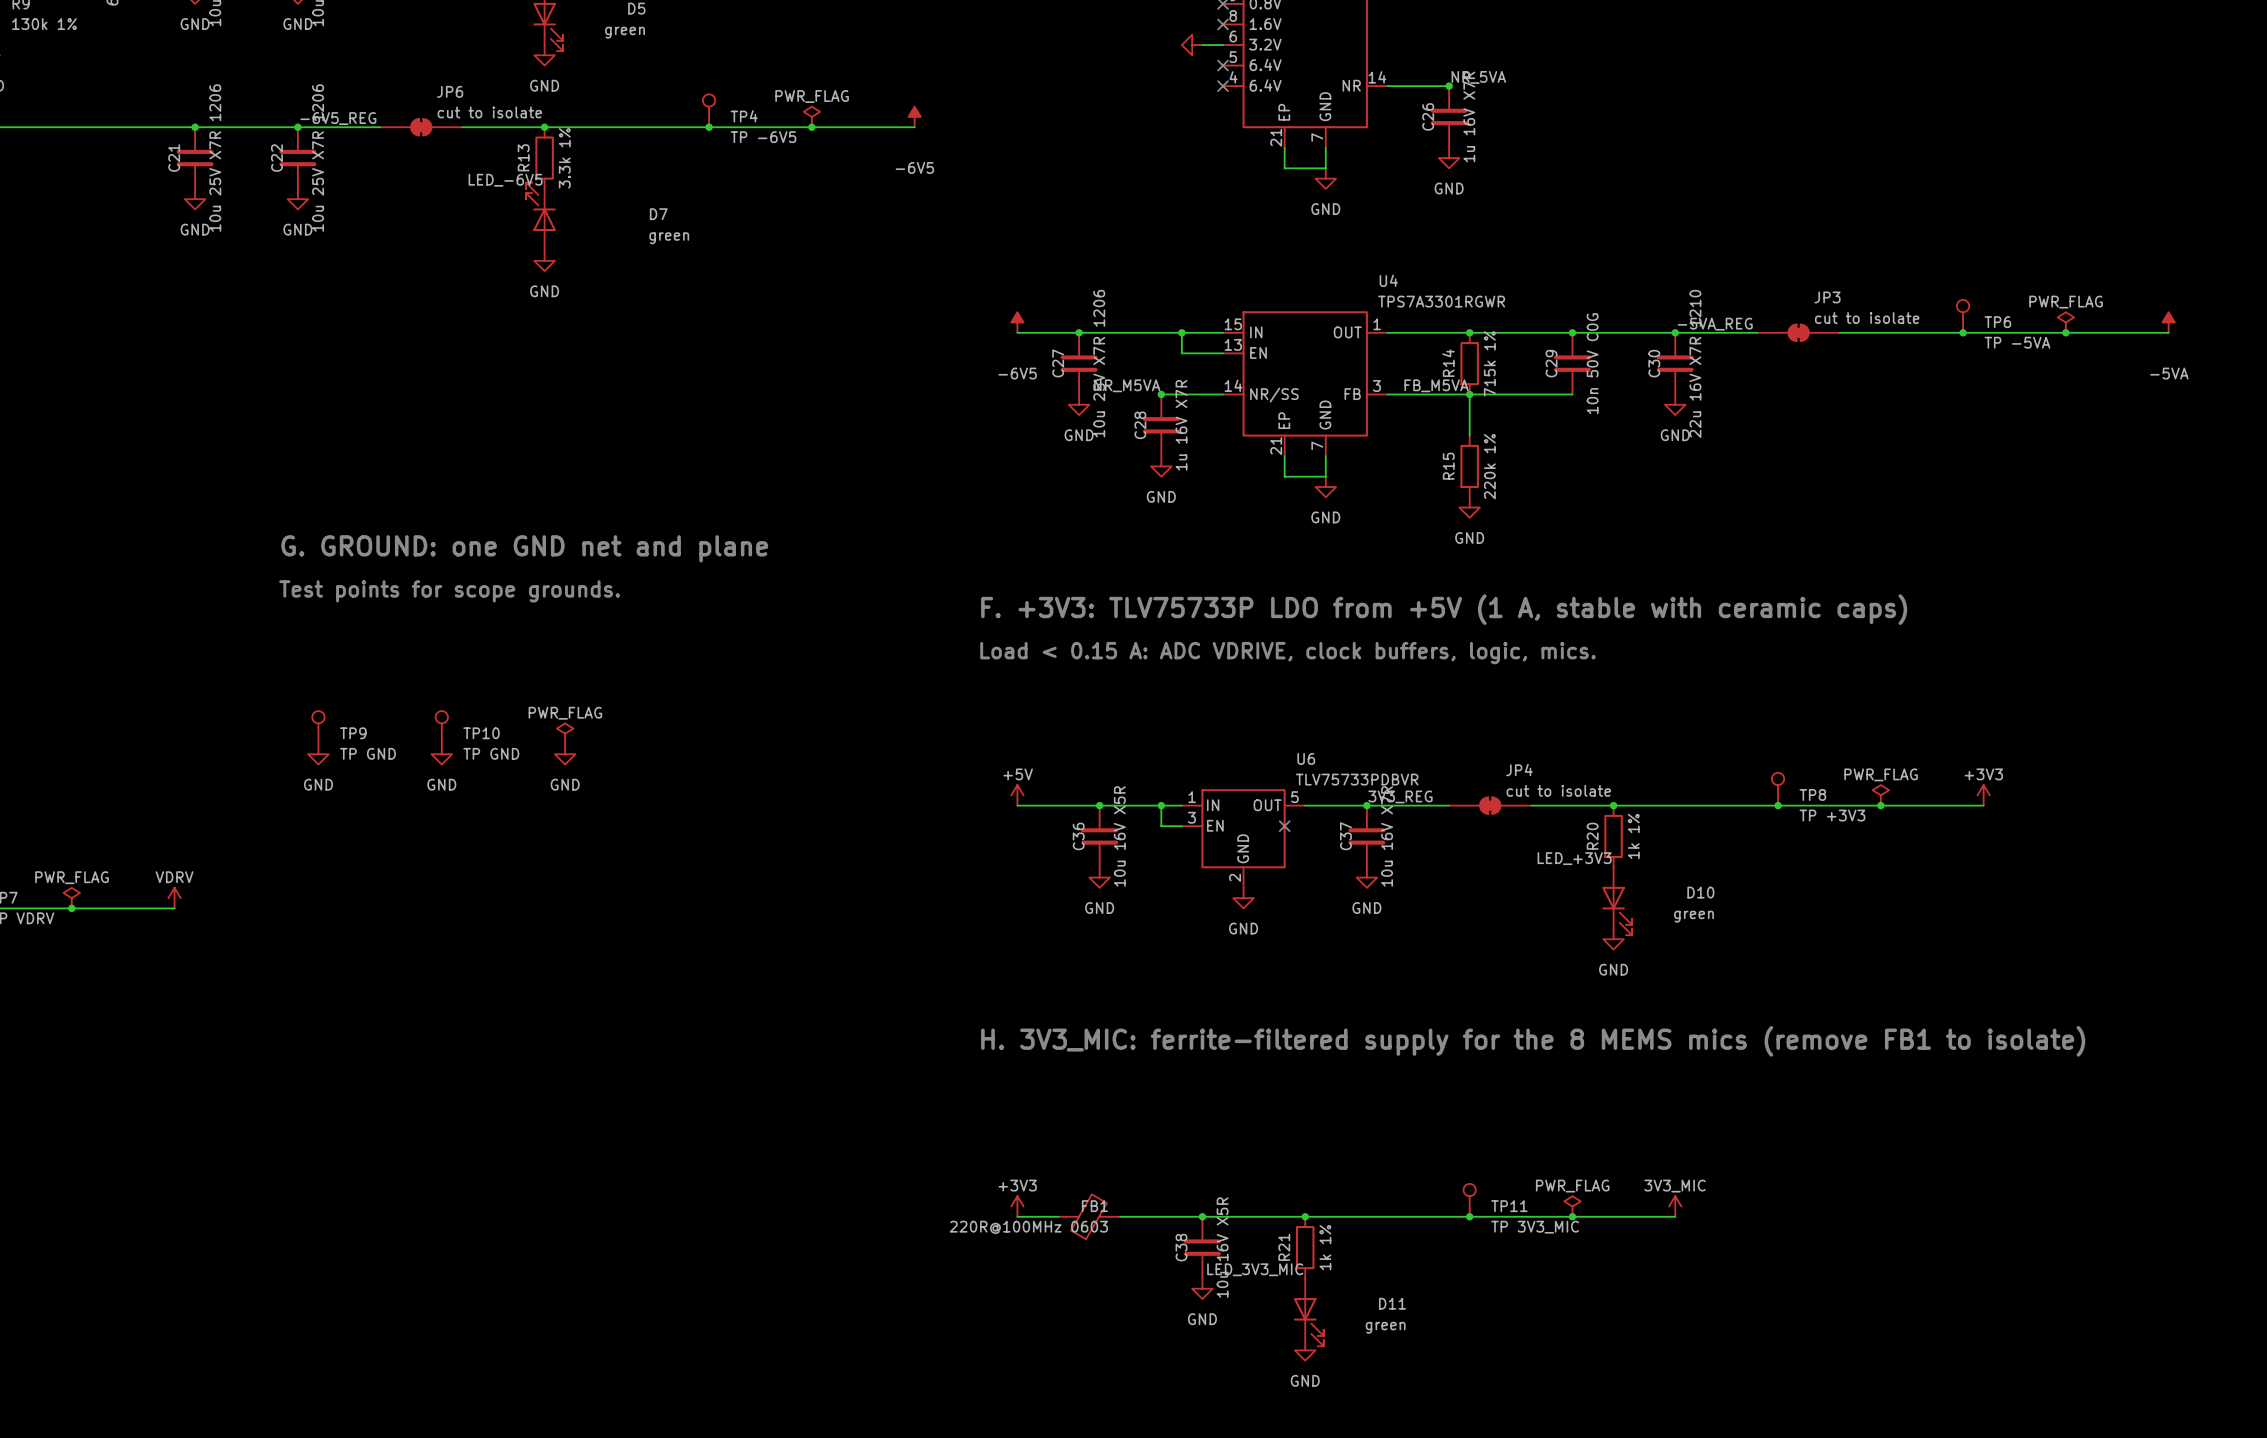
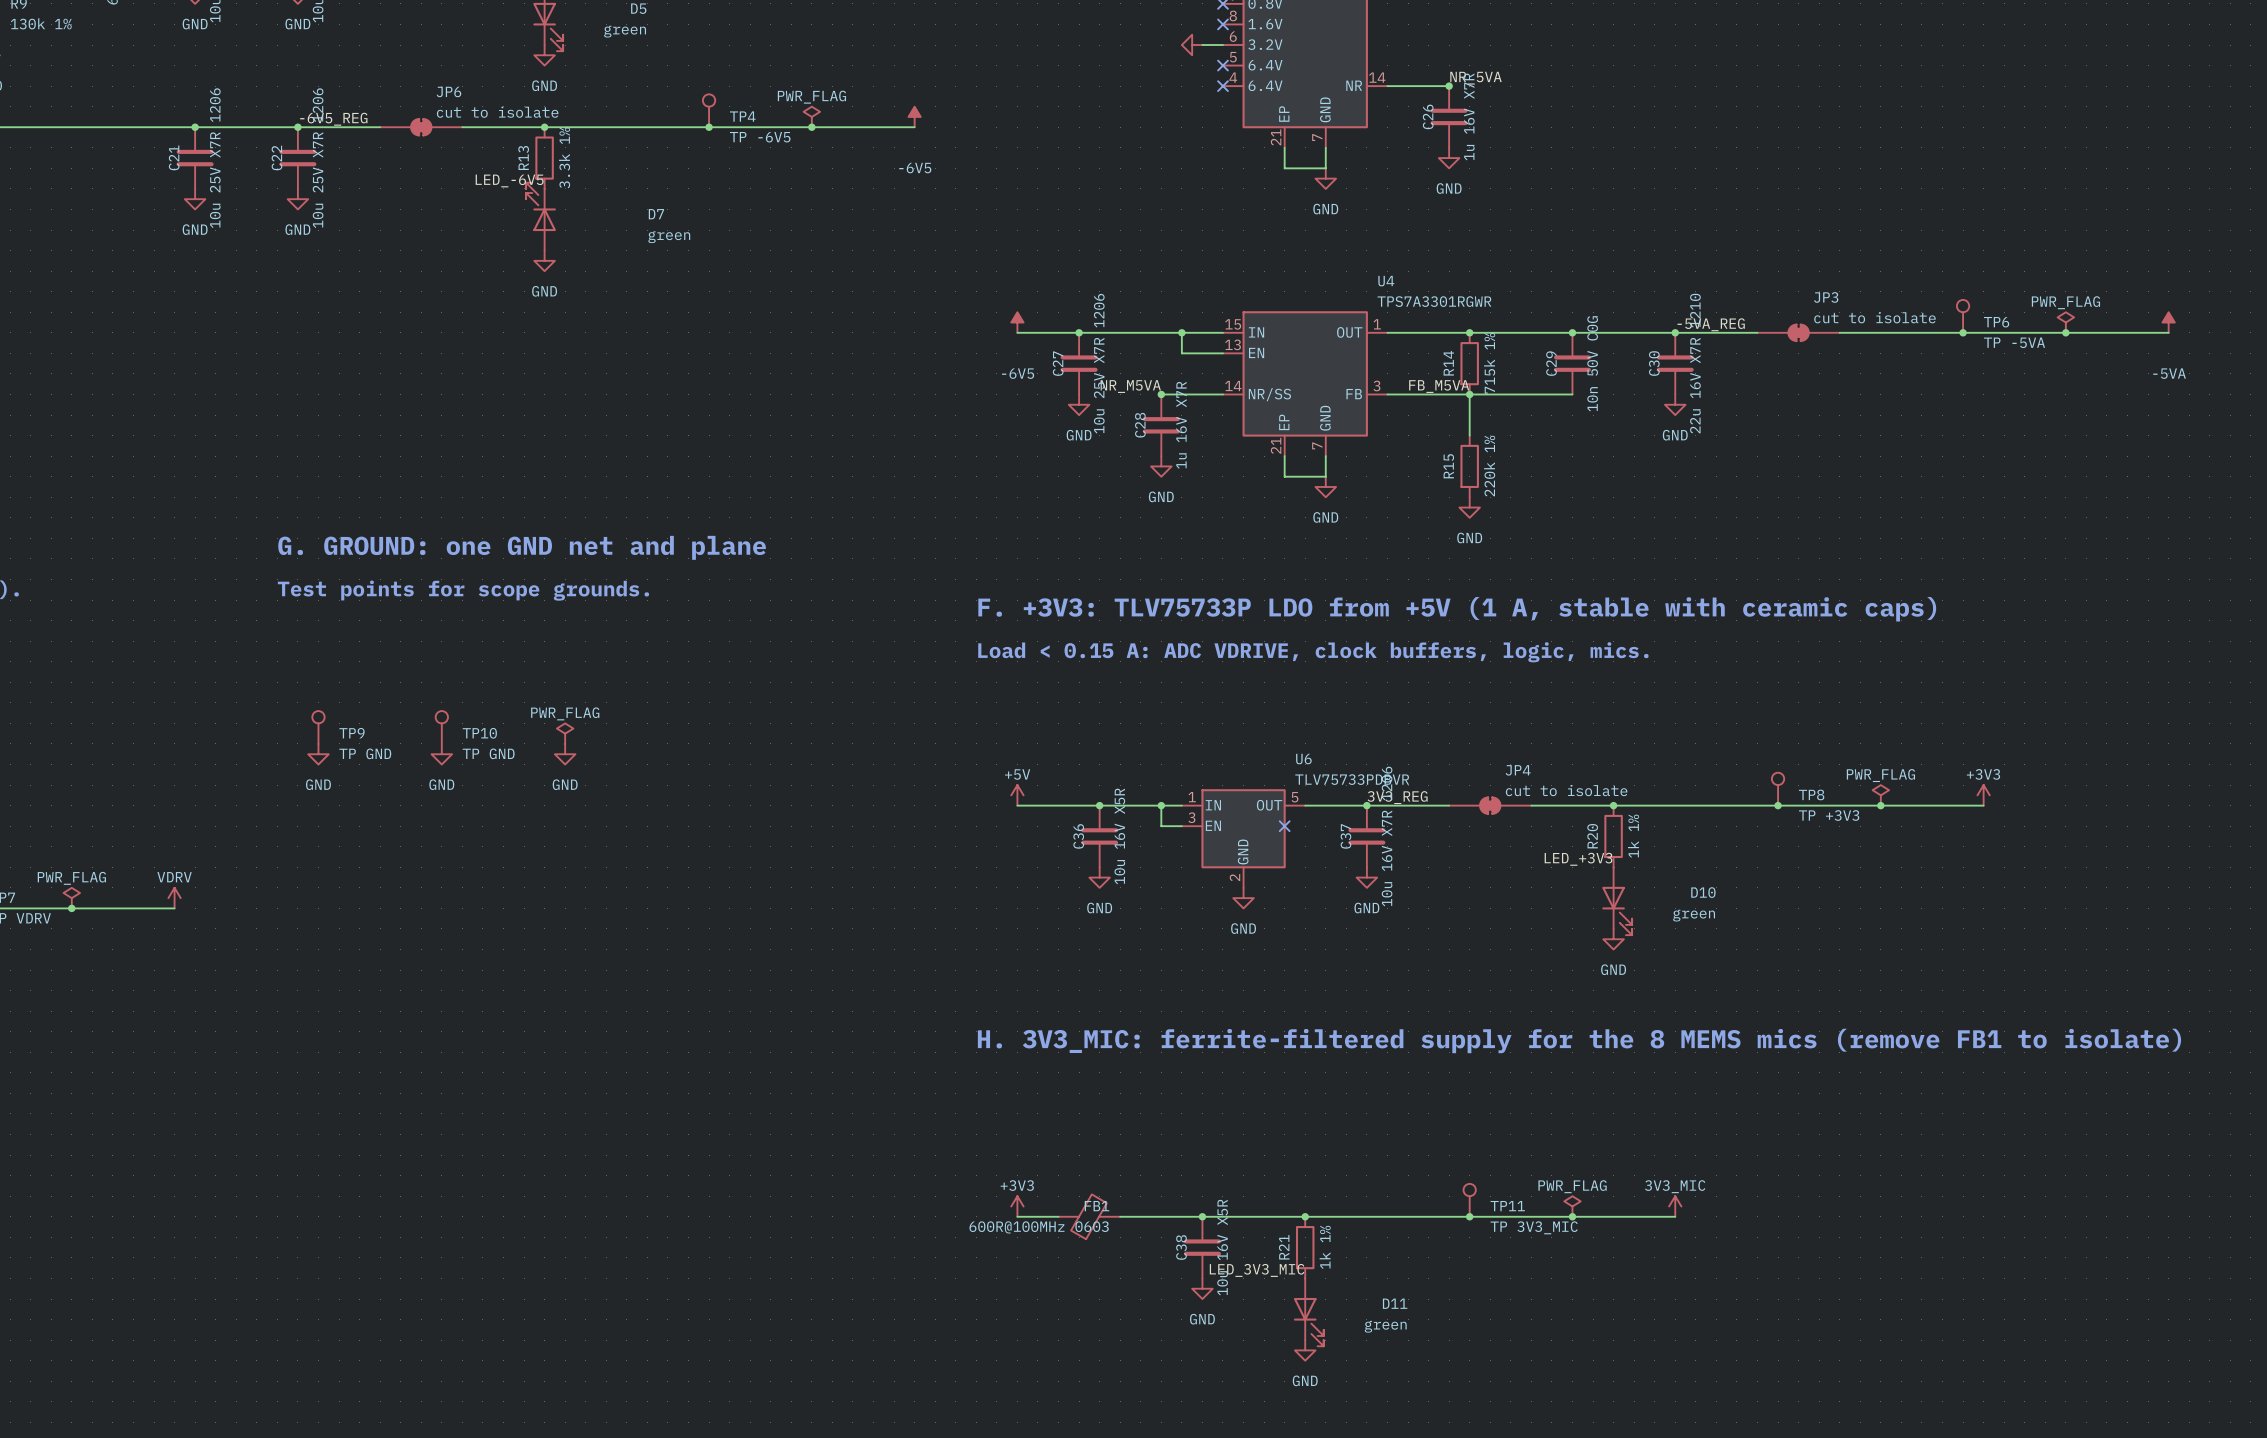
C37 value: 10u 16V X7R (1387, 836) -> 10u 16V X7R 1206 (1387, 836)
FB1 value: 220R@100MHz 0603 (1028, 1227) -> 600R@100MHz 0603 (1039, 1227)

